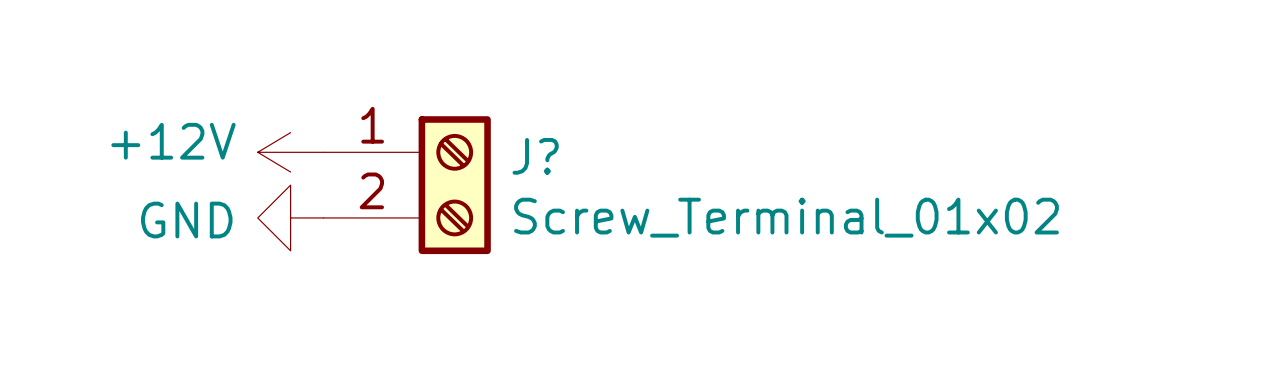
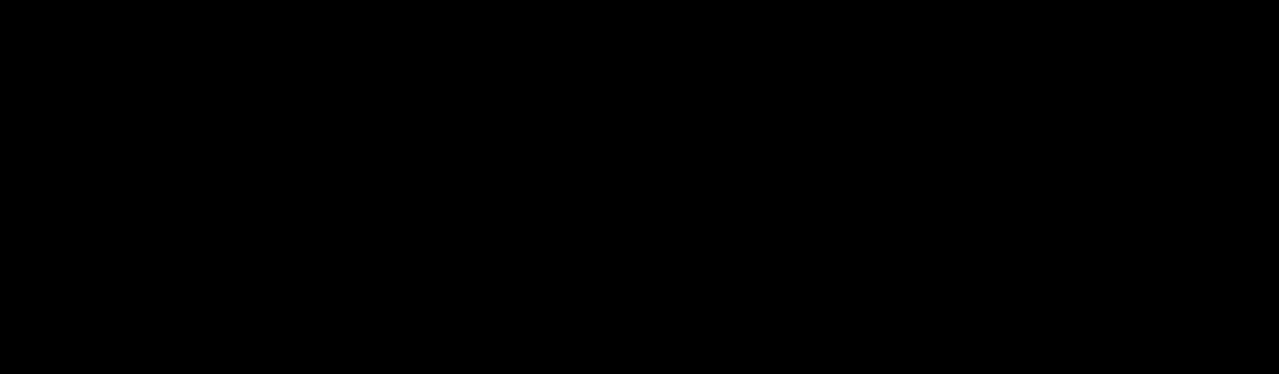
power symbol: +12V (290, 152) -> none
J?: Screw_Terminal_01x02 (407, 185) -> none
power symbol: GND (290, 217) -> none

